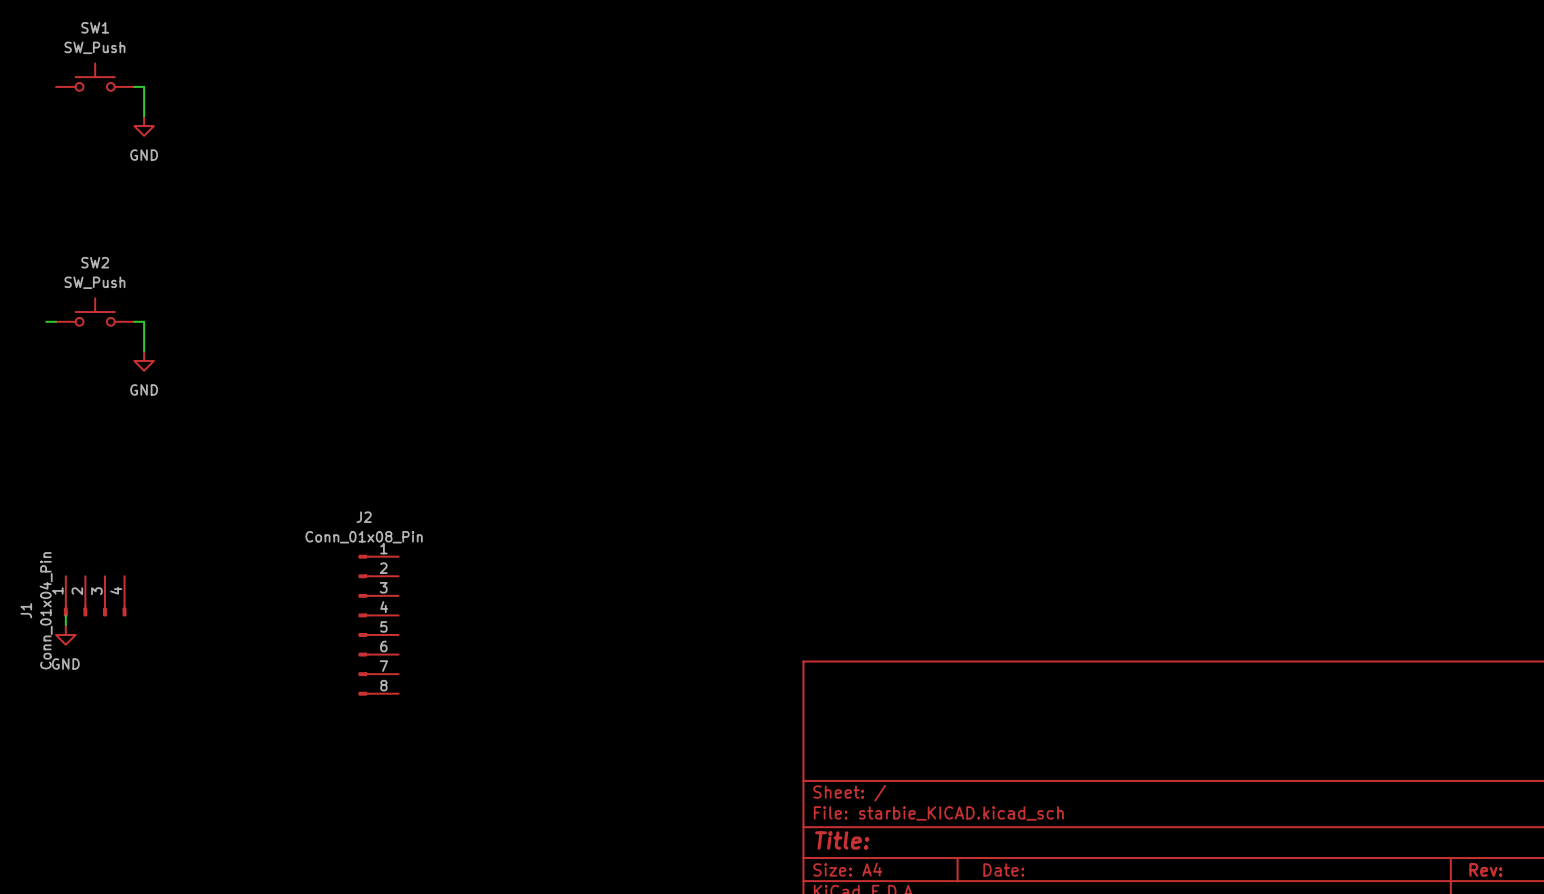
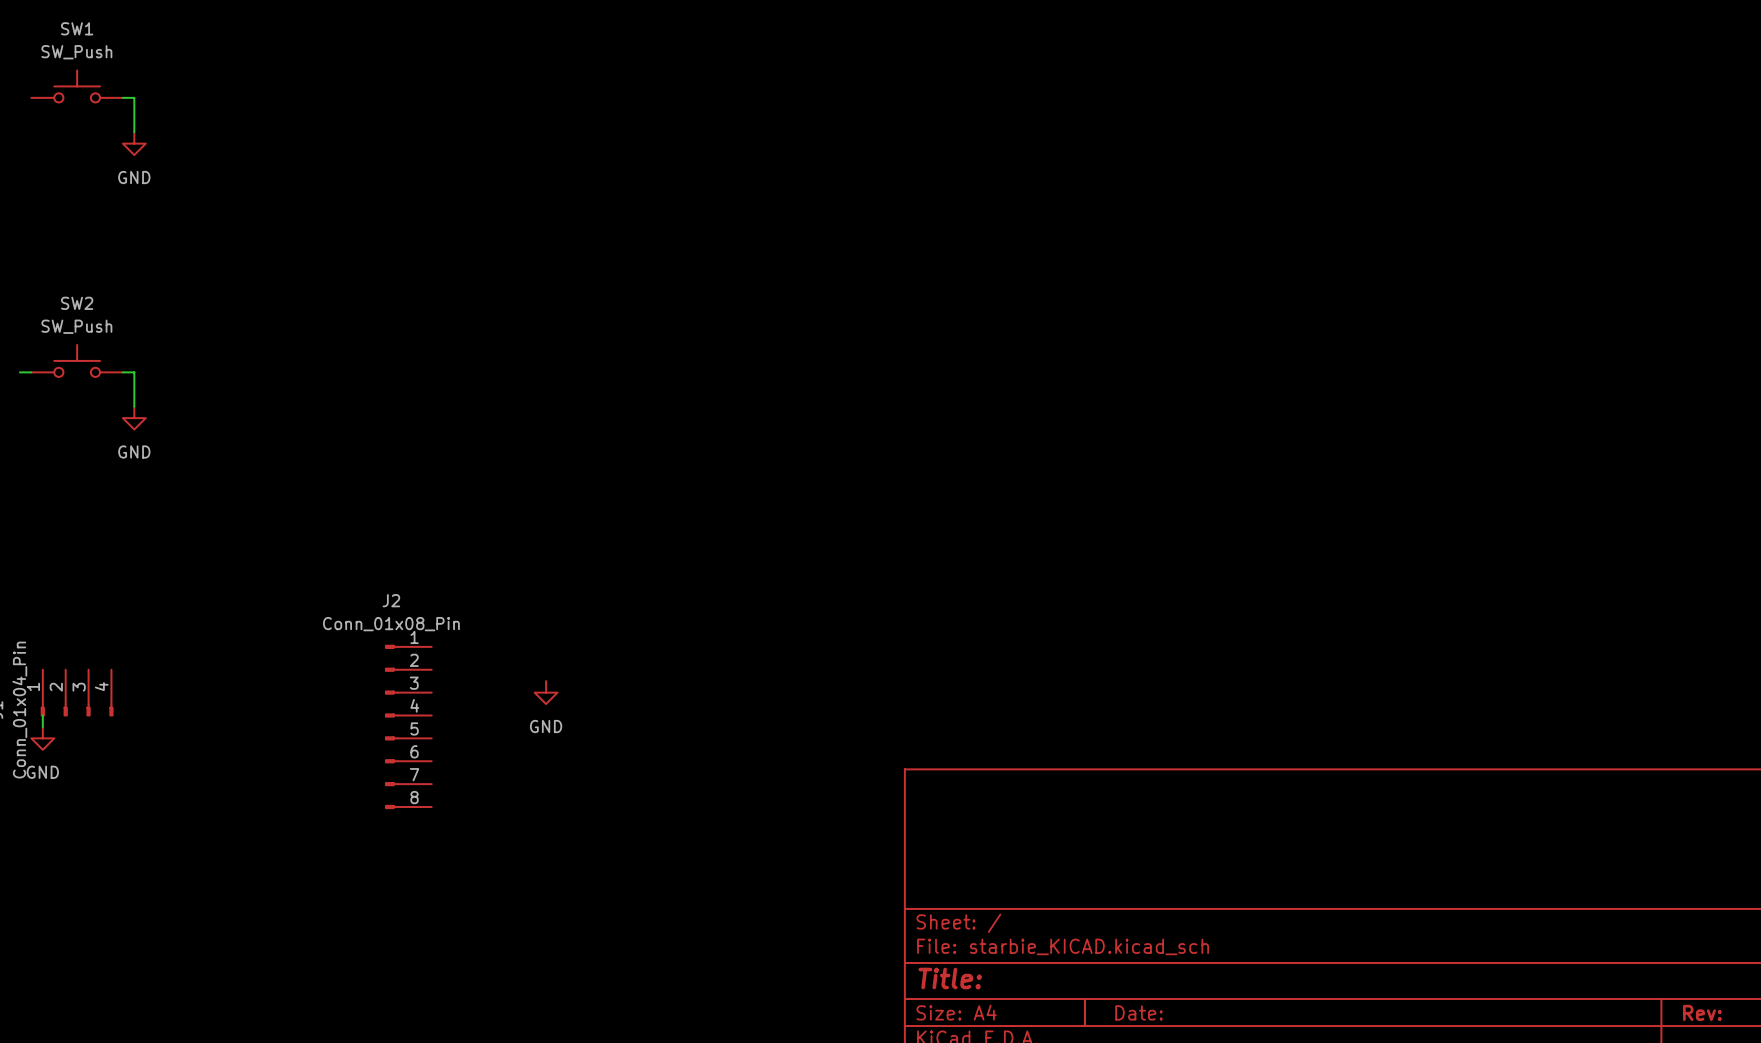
power symbol: none -> GND (546, 692)

